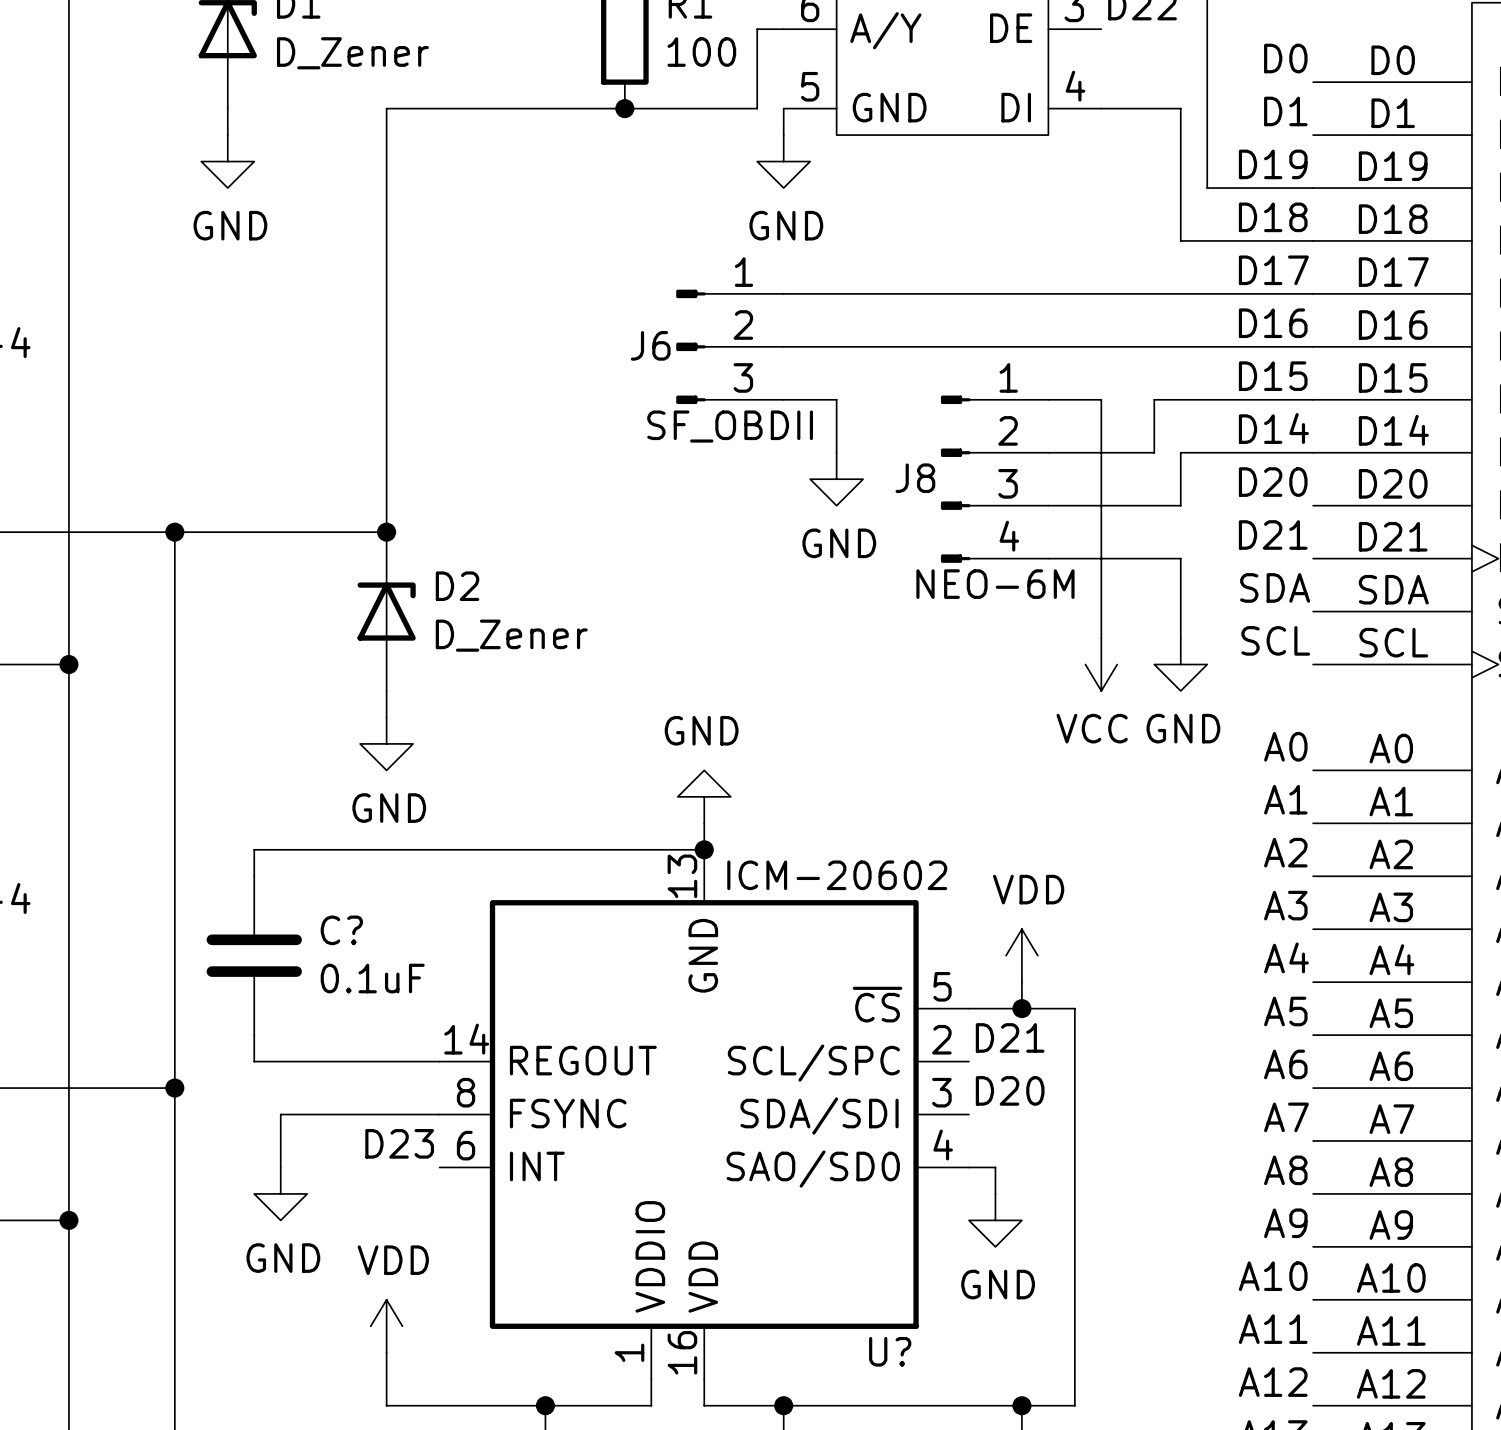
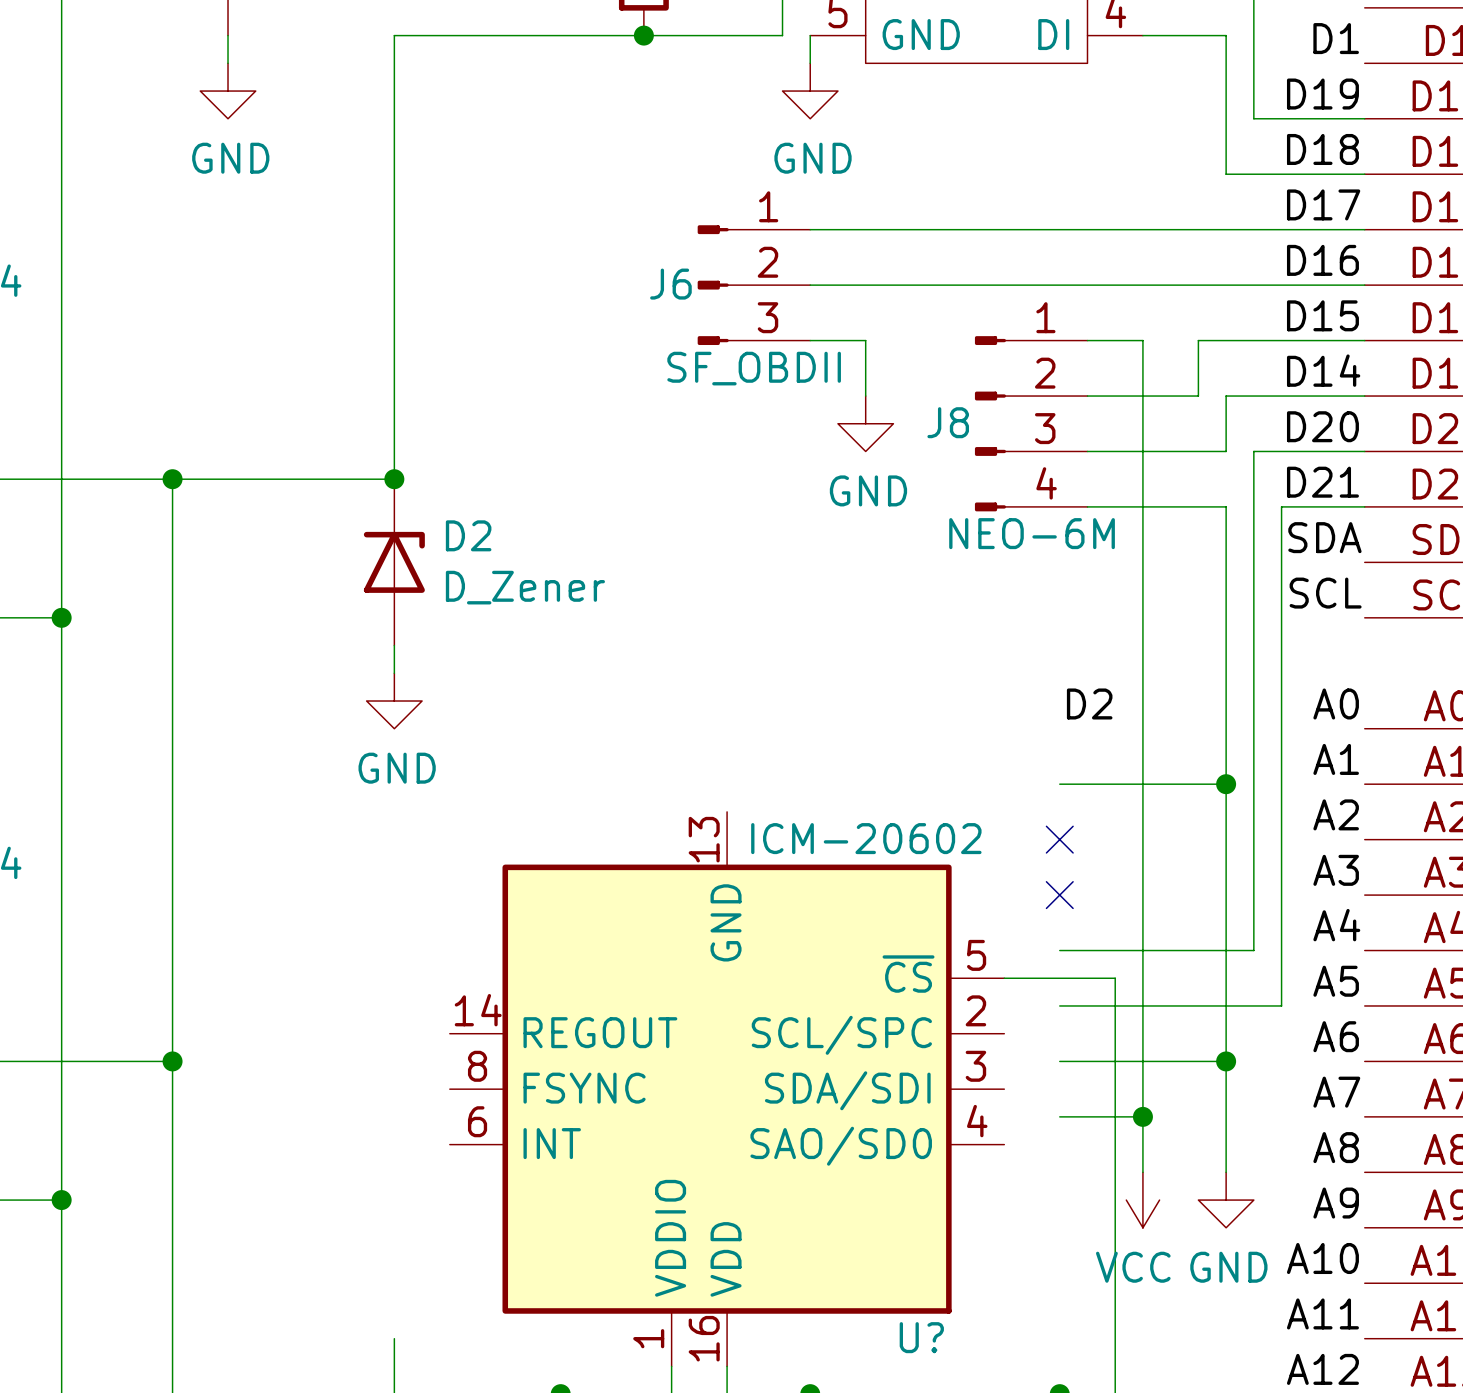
wire: none -> (1364, 506) (1281, 506) (1281, 1005) (1059, 1005)
wire: none -> (1142, 590) (1142, 1172)
wire: none -> (1226, 590) (1226, 1172)
power symbol: VCC (1101, 664) -> none
power symbol: GND (1180, 664) -> none
label: none -> D2 (1089, 703)
power symbol: GND (704, 796) -> none
wire: (704, 823) (704, 849) (254, 849) (254, 876) -> none
wire: none -> (1059, 784) (1226, 784)
junction: none -> (1226, 784)
junction: (704, 849) -> none
no-connect mark: none -> (1059, 839)
no-connect mark: none -> (1059, 895)
C?: 0.1uF (254, 955) -> none
power symbol: VDD (1021, 955) -> none
wire: (1021, 982) (1021, 1008) -> (1059, 950) (1253, 950) (1253, 451) (1364, 451)
junction: (1021, 1008) -> none
wire: (254, 1035) (254, 1061) (439, 1061) -> none
label: D21 (1010, 1037) -> none
wire: none -> (1059, 1061) (1226, 1061)
junction: none -> (1226, 1061)
label: D20 (1010, 1090) -> none
wire: (439, 1114) (280, 1114) (280, 1167) -> none
wire: none -> (1059, 1116) (1142, 1116)
junction: none -> (1142, 1116)
label: D23 (399, 1143) -> none
wire: (968, 1167) (995, 1167) (995, 1193) -> none
power symbol: GND (280, 1193) -> none
power symbol position: GND (995, 1220) -> GND (1226, 1200)
power symbol: none -> VCC (1142, 1200)
power symbol: VDD (386, 1326) -> none

